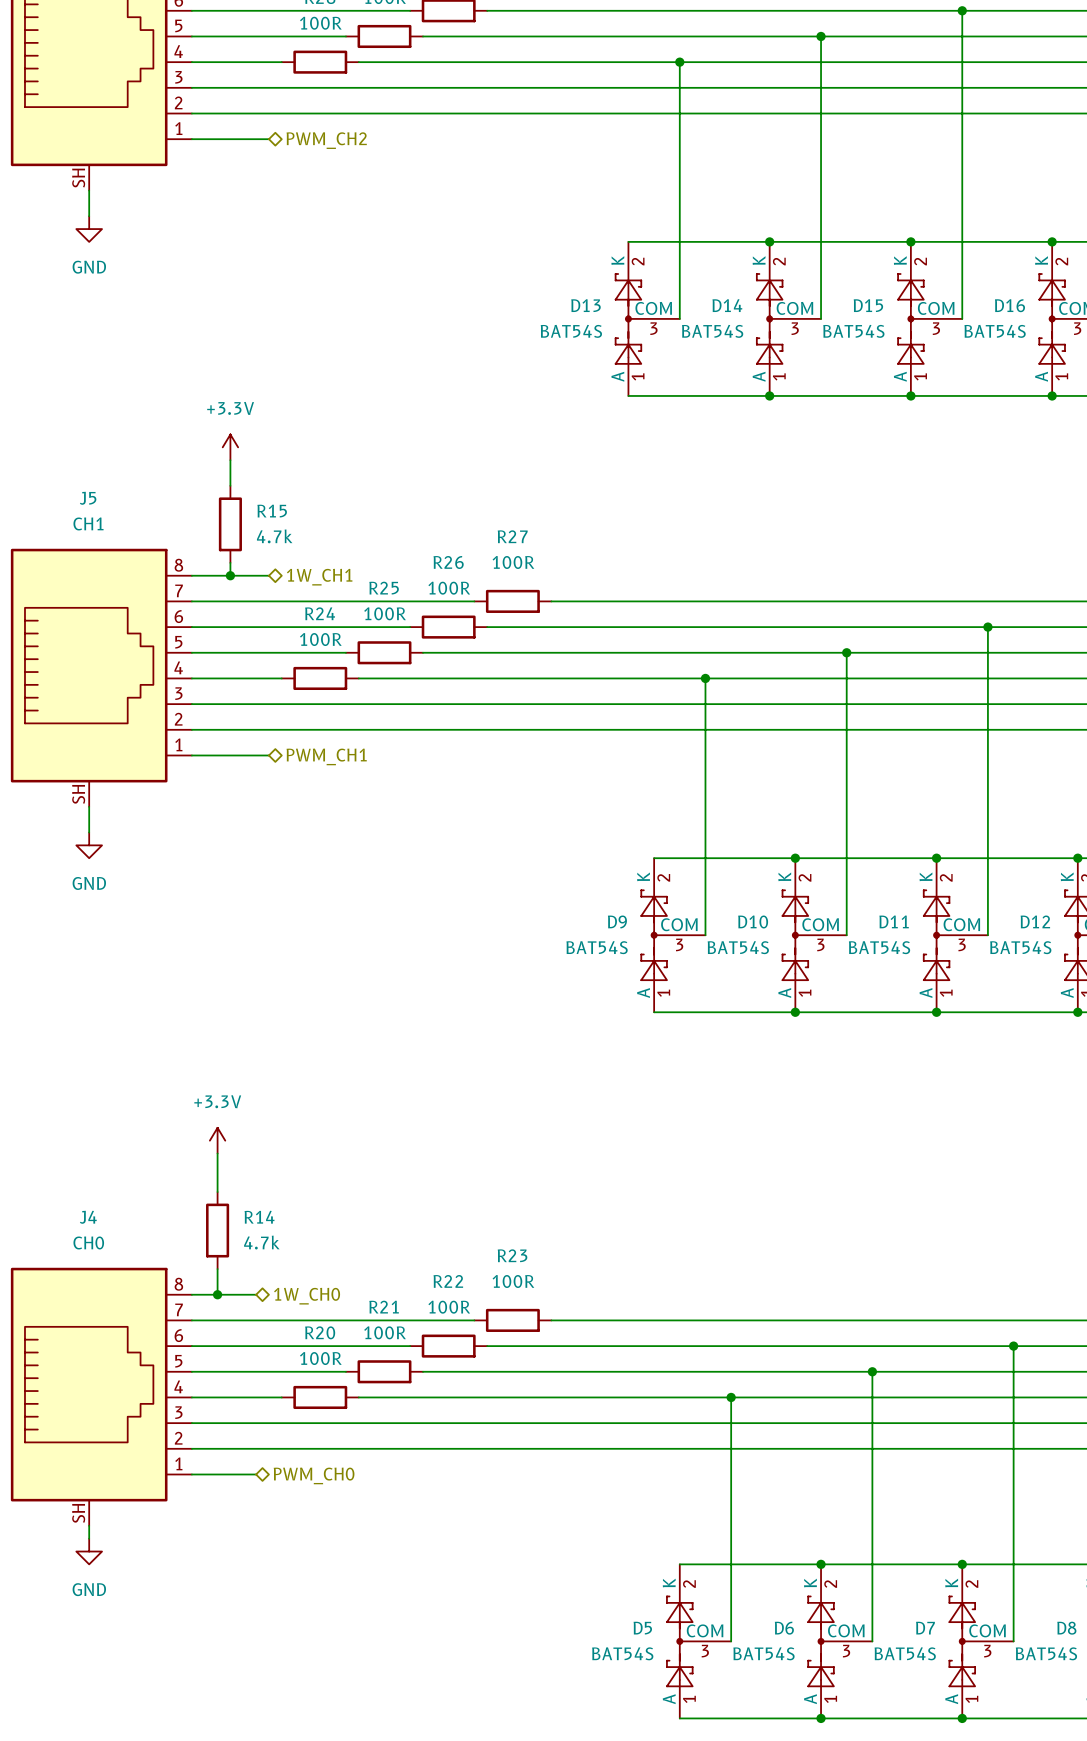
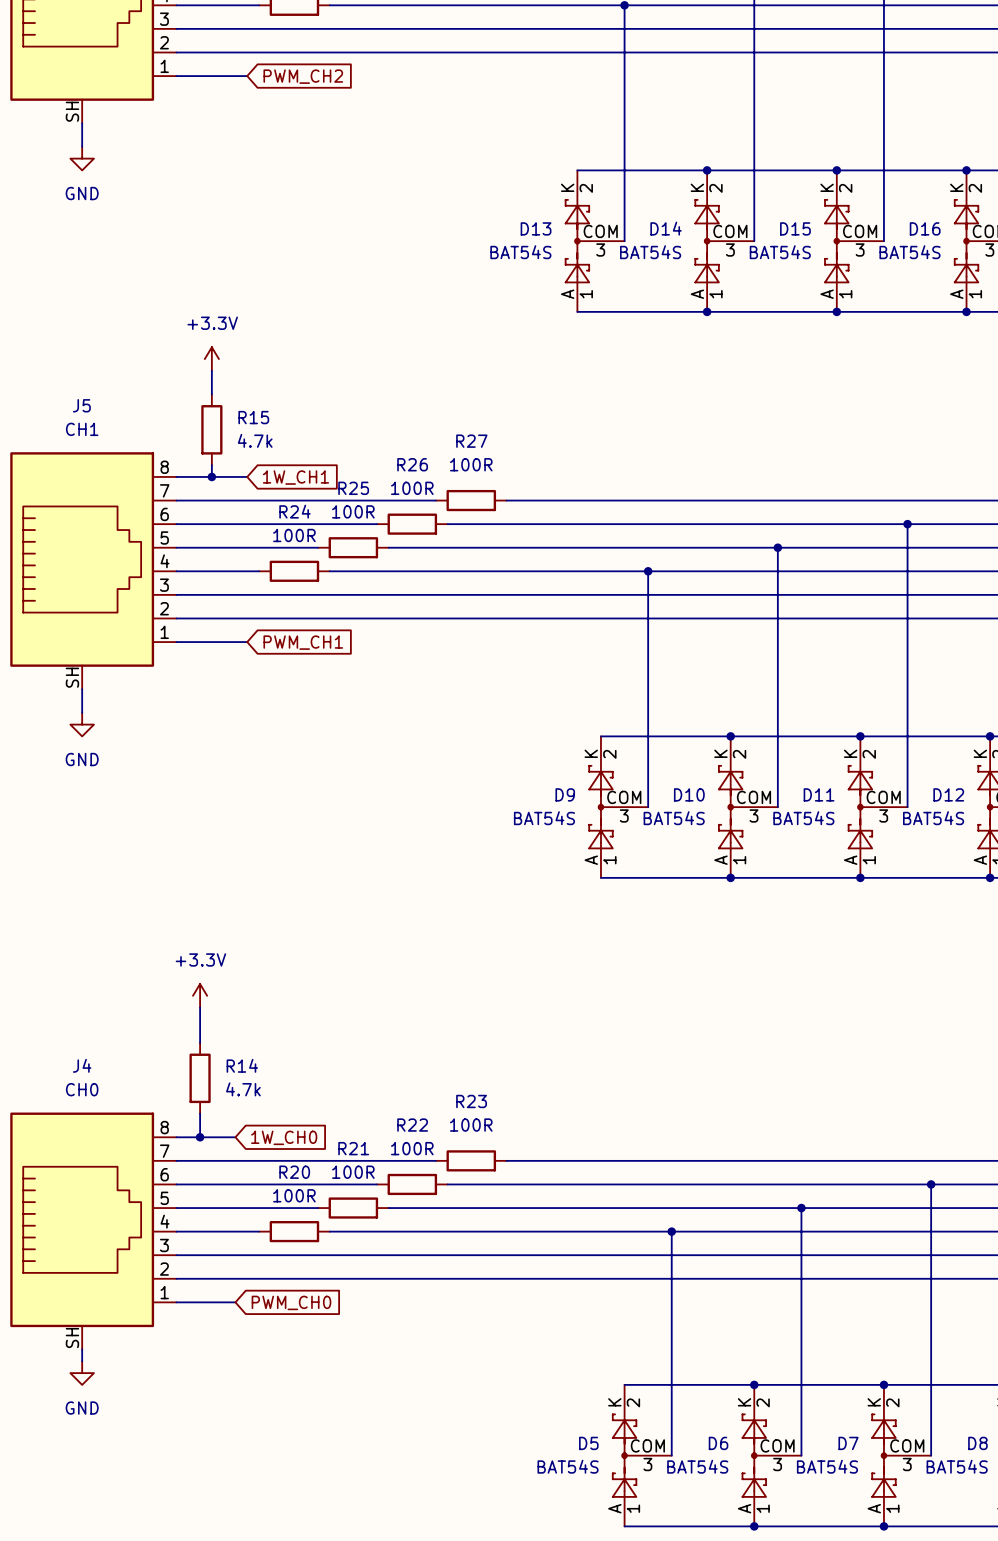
hierarchical label: PWM_CH2 (326, 140) -> none
global label: none -> PWM_CH2 (303, 76)
global label: none -> 1W_CH1 (295, 477)
hierarchical label: 1W_CH1 (319, 577) -> none
hierarchical label: PWM_CH1 (326, 756) -> none
global label: none -> PWM_CH1 (303, 642)
global label: none -> 1W_CH0 (284, 1137)
hierarchical label: 1W_CH0 (307, 1296) -> none
hierarchical label: PWM_CH0 (314, 1475) -> none
global label: none -> PWM_CH0 (291, 1302)

